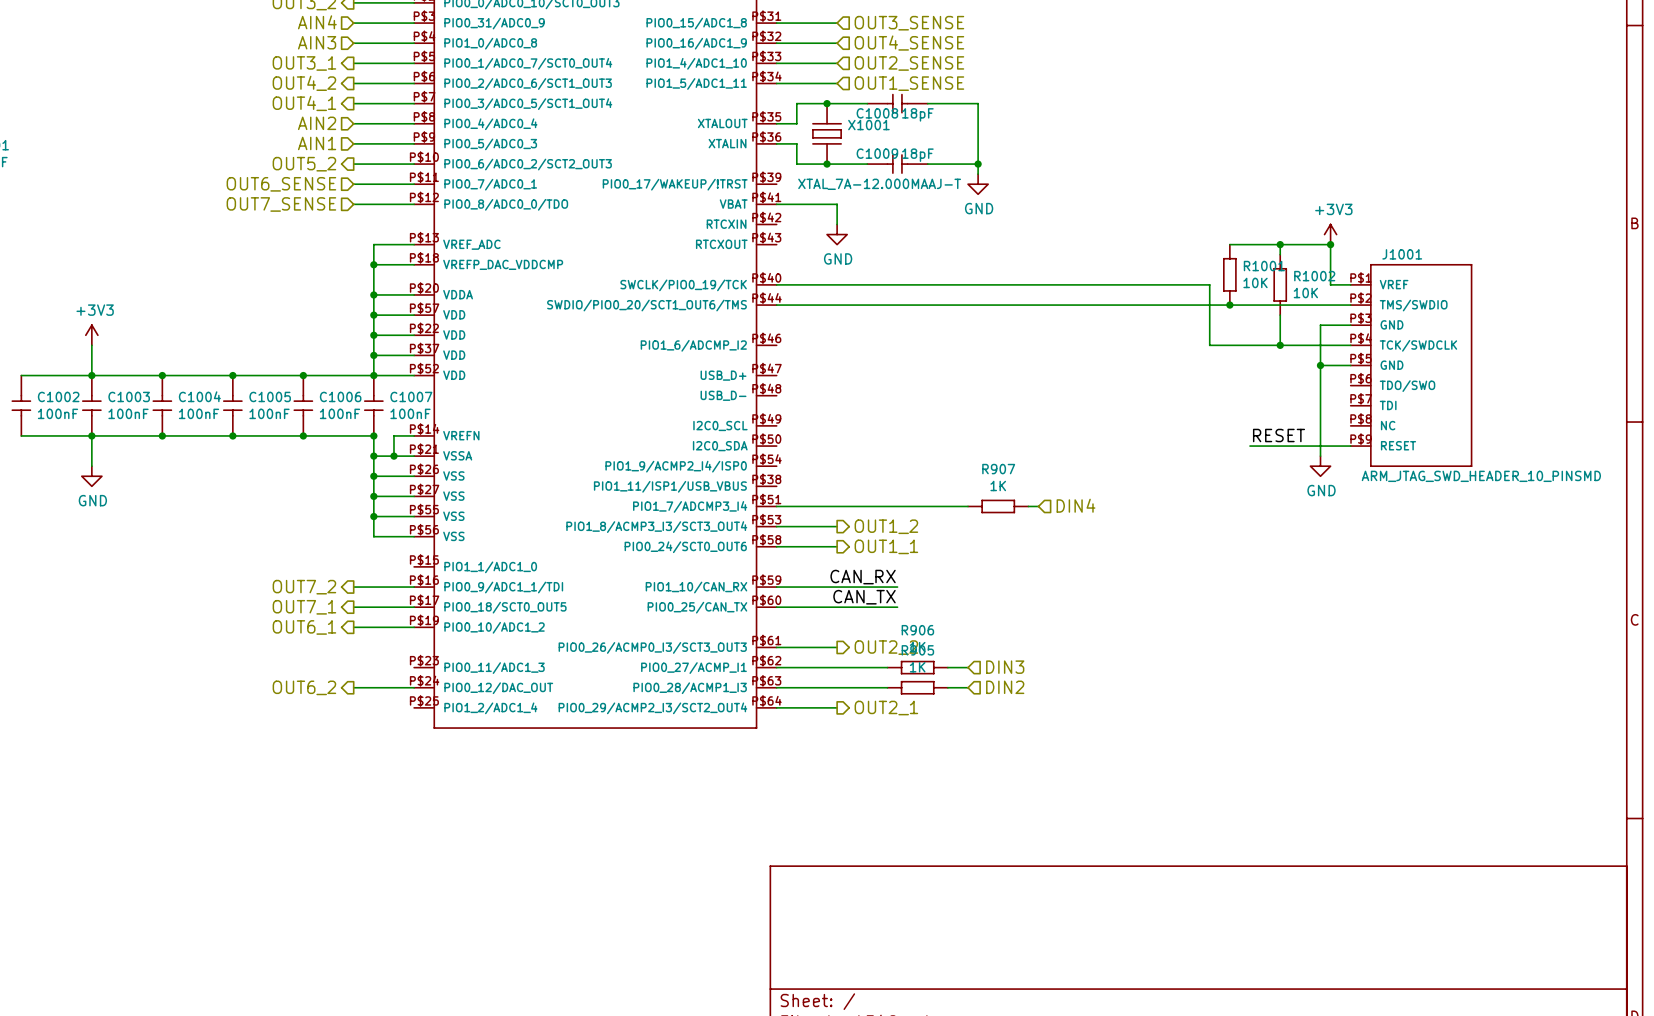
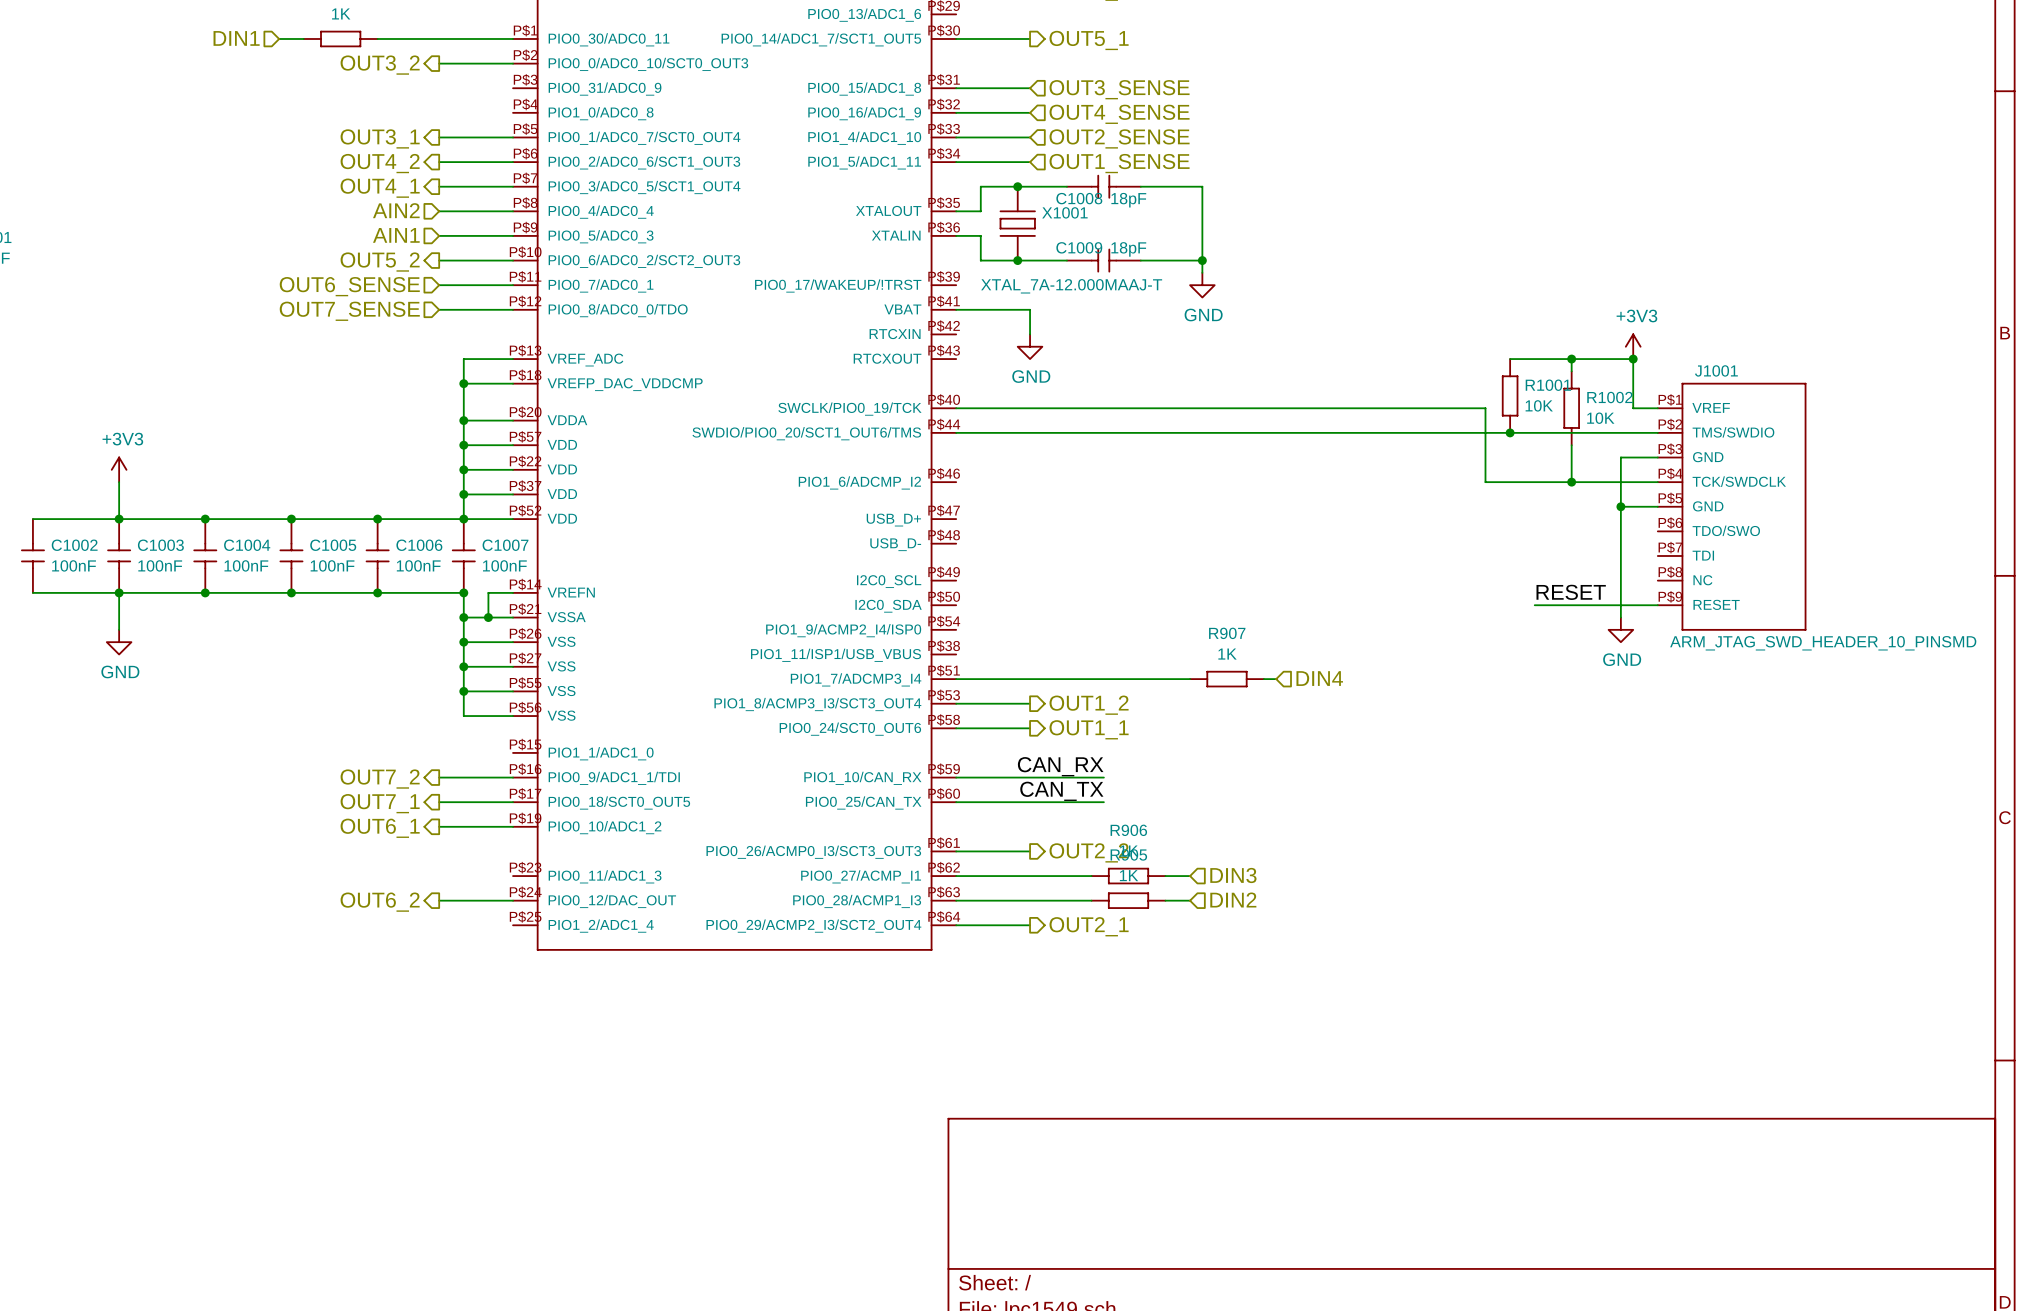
hierarchical label: AIN4 (317, 22) -> none
wire: (353, 23) (414, 23) -> none
hierarchical label: AIN3 (317, 42) -> none
wire: (353, 43) (414, 43) -> none

